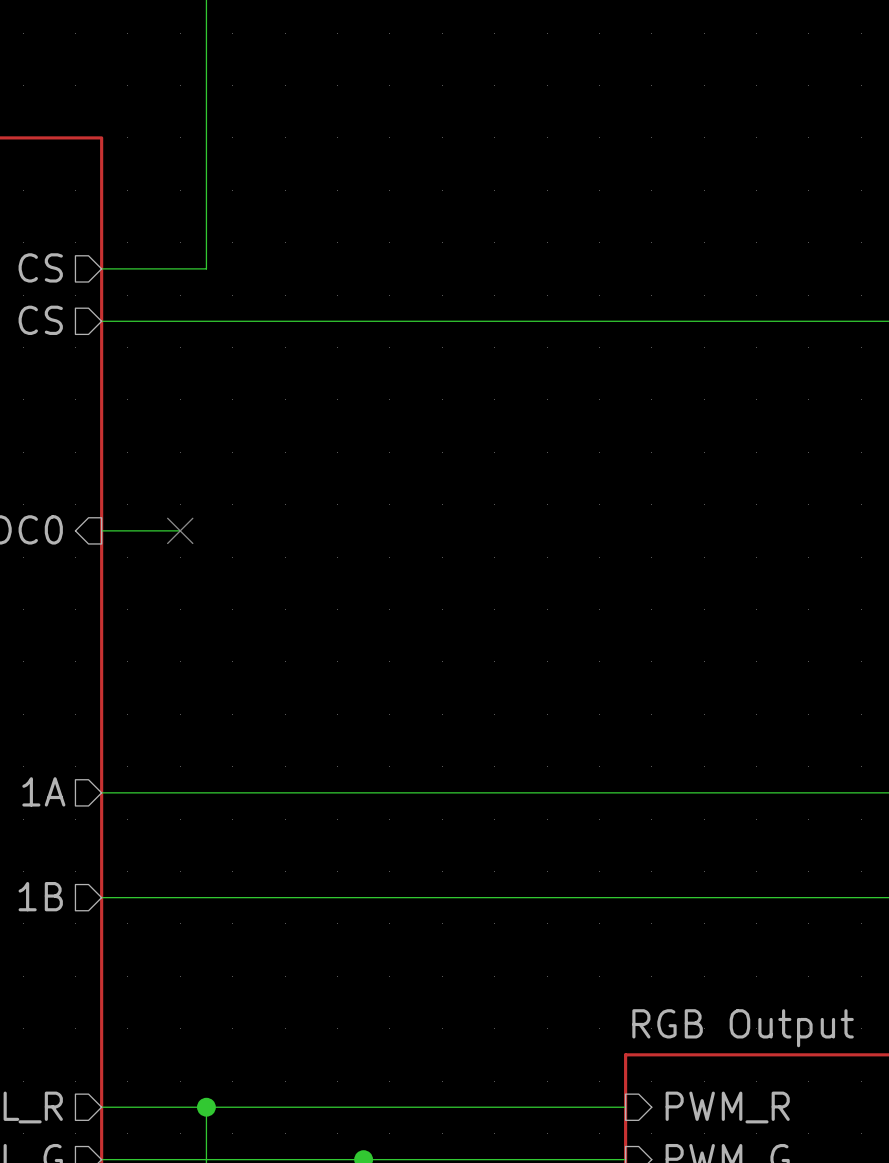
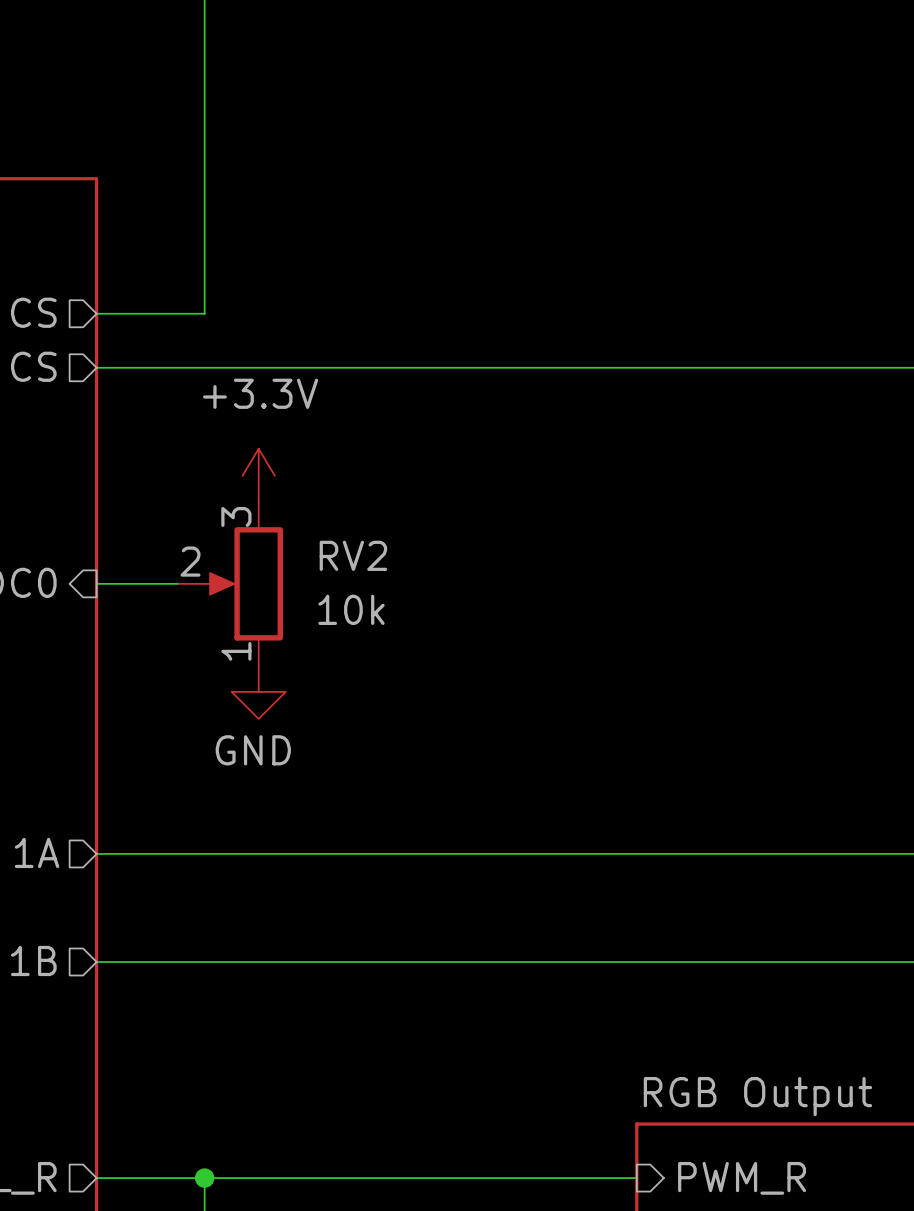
power symbol: none -> +3.3V (258, 475)
no-connect mark: (180, 530) -> none
RV2: none -> 10k (230, 583)
power symbol: none -> GND (258, 691)

